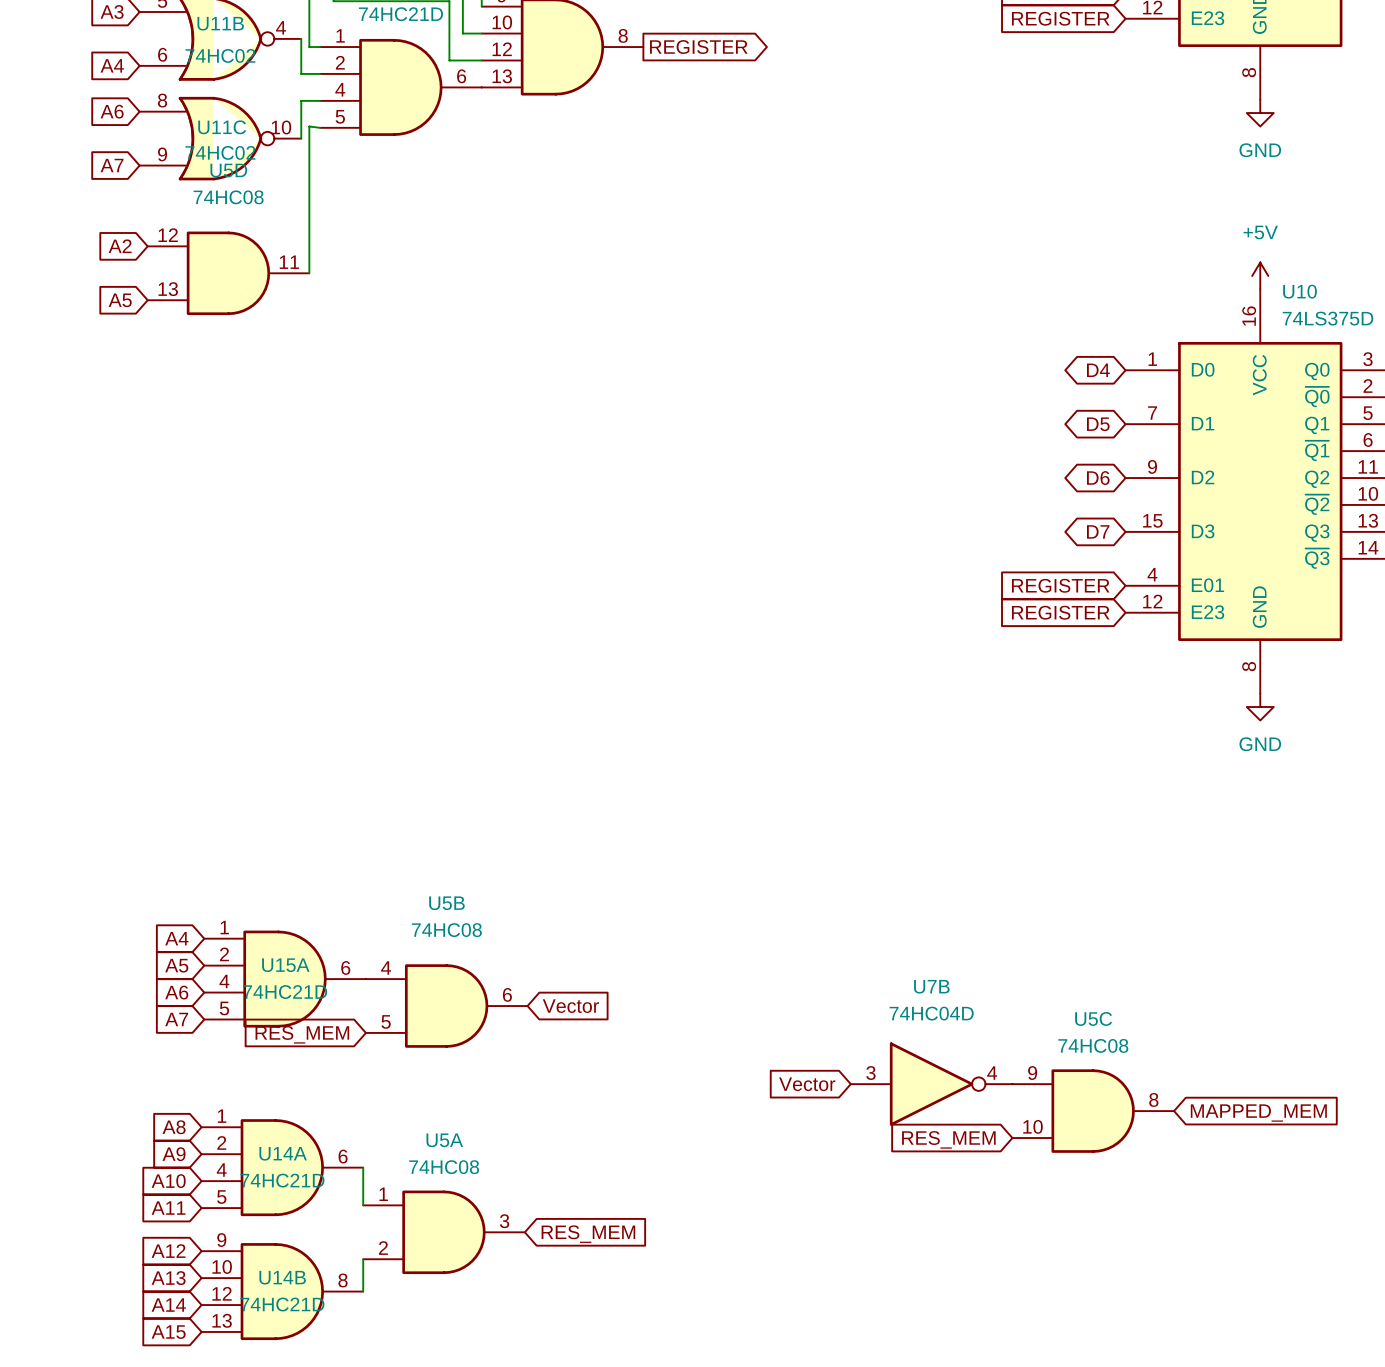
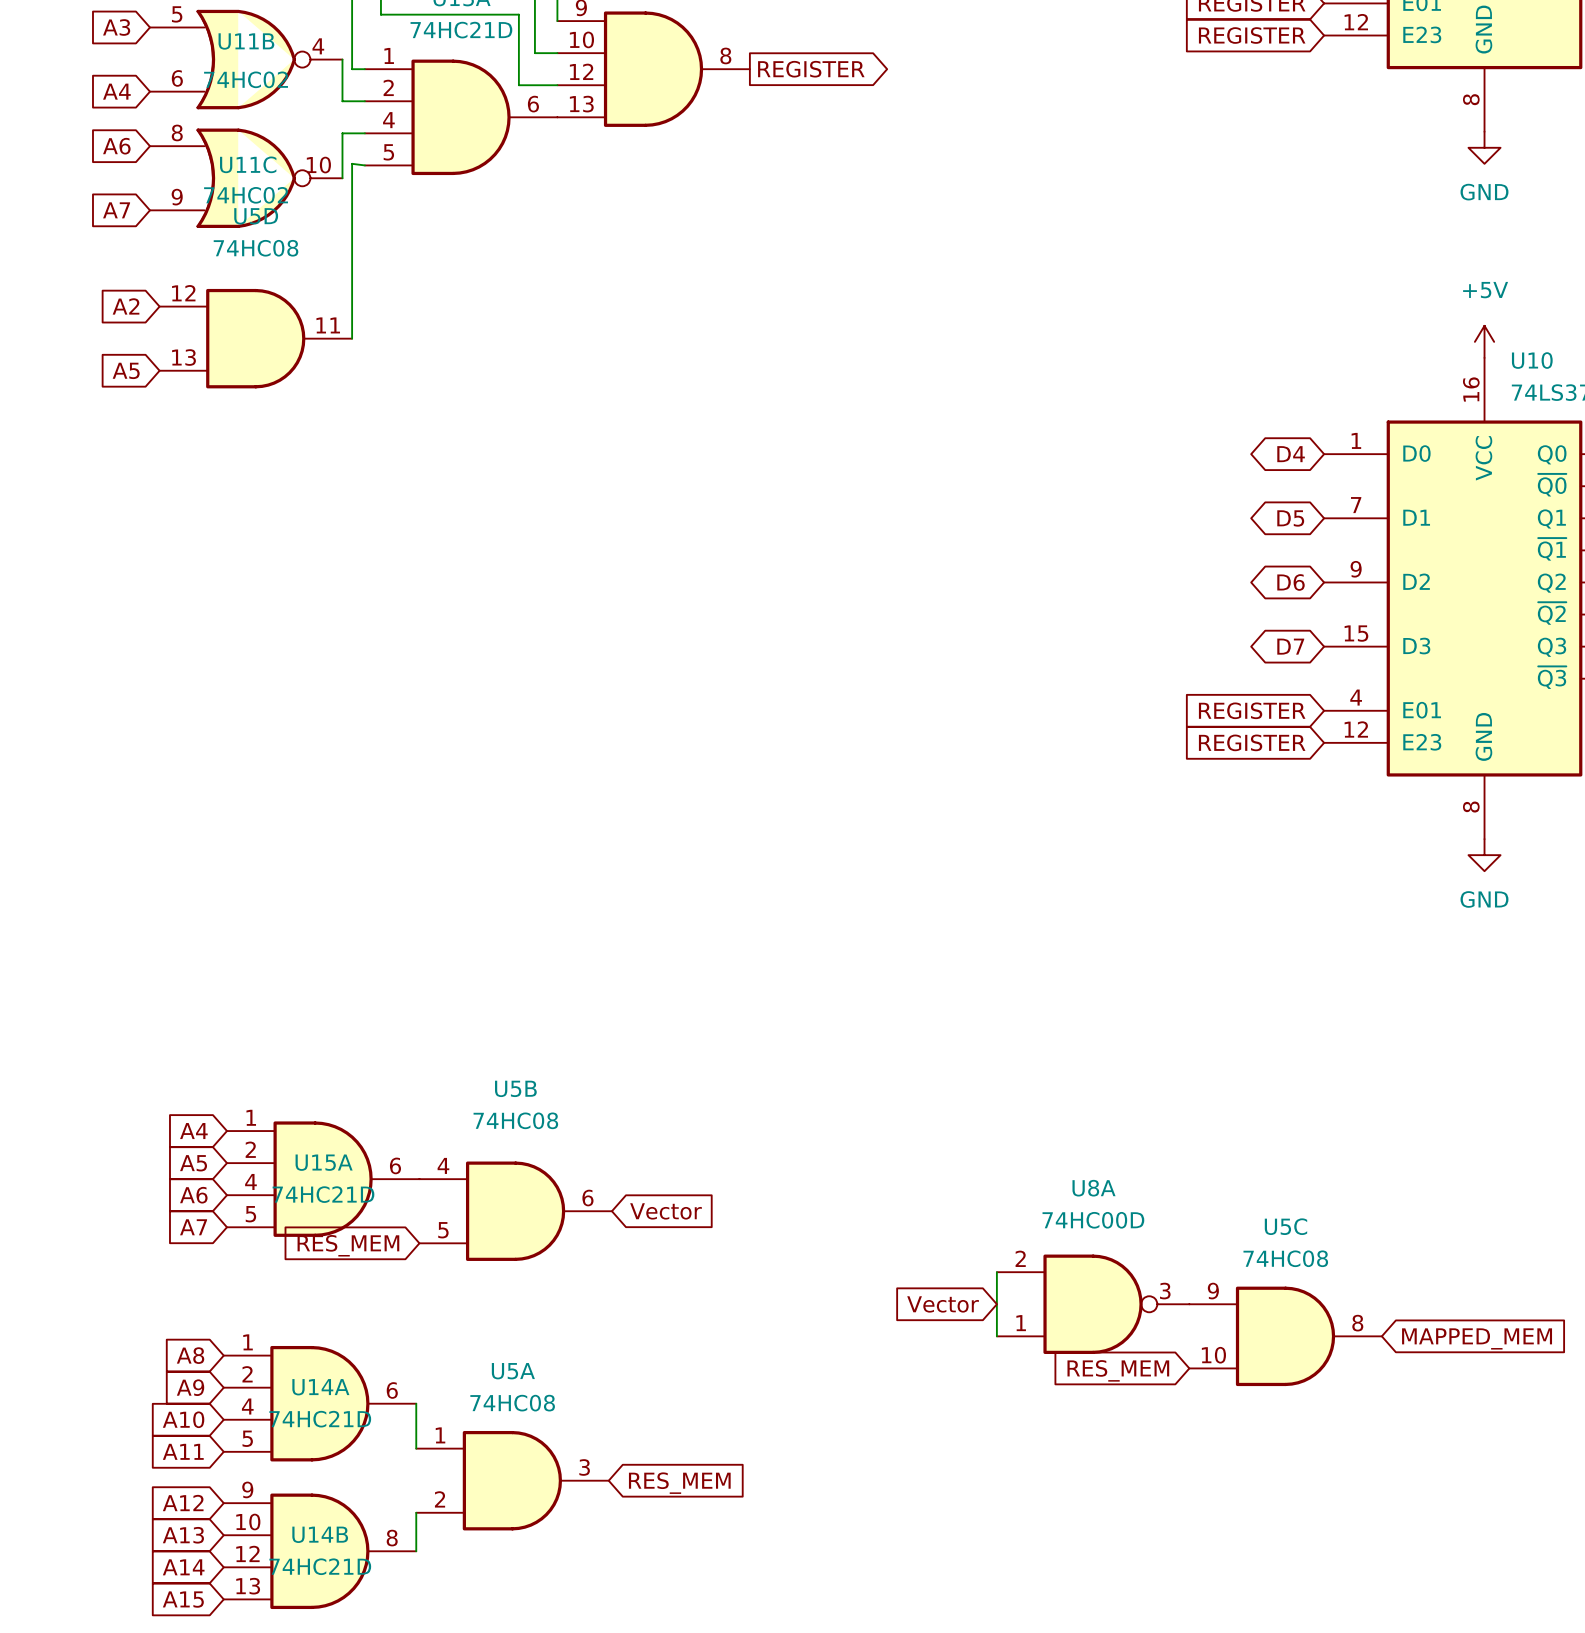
wire: none -> (996, 1272) (996, 1336)
U7B: 74HC04D (931, 1084) -> none
U8A: none -> 74HC00D (1093, 1304)

